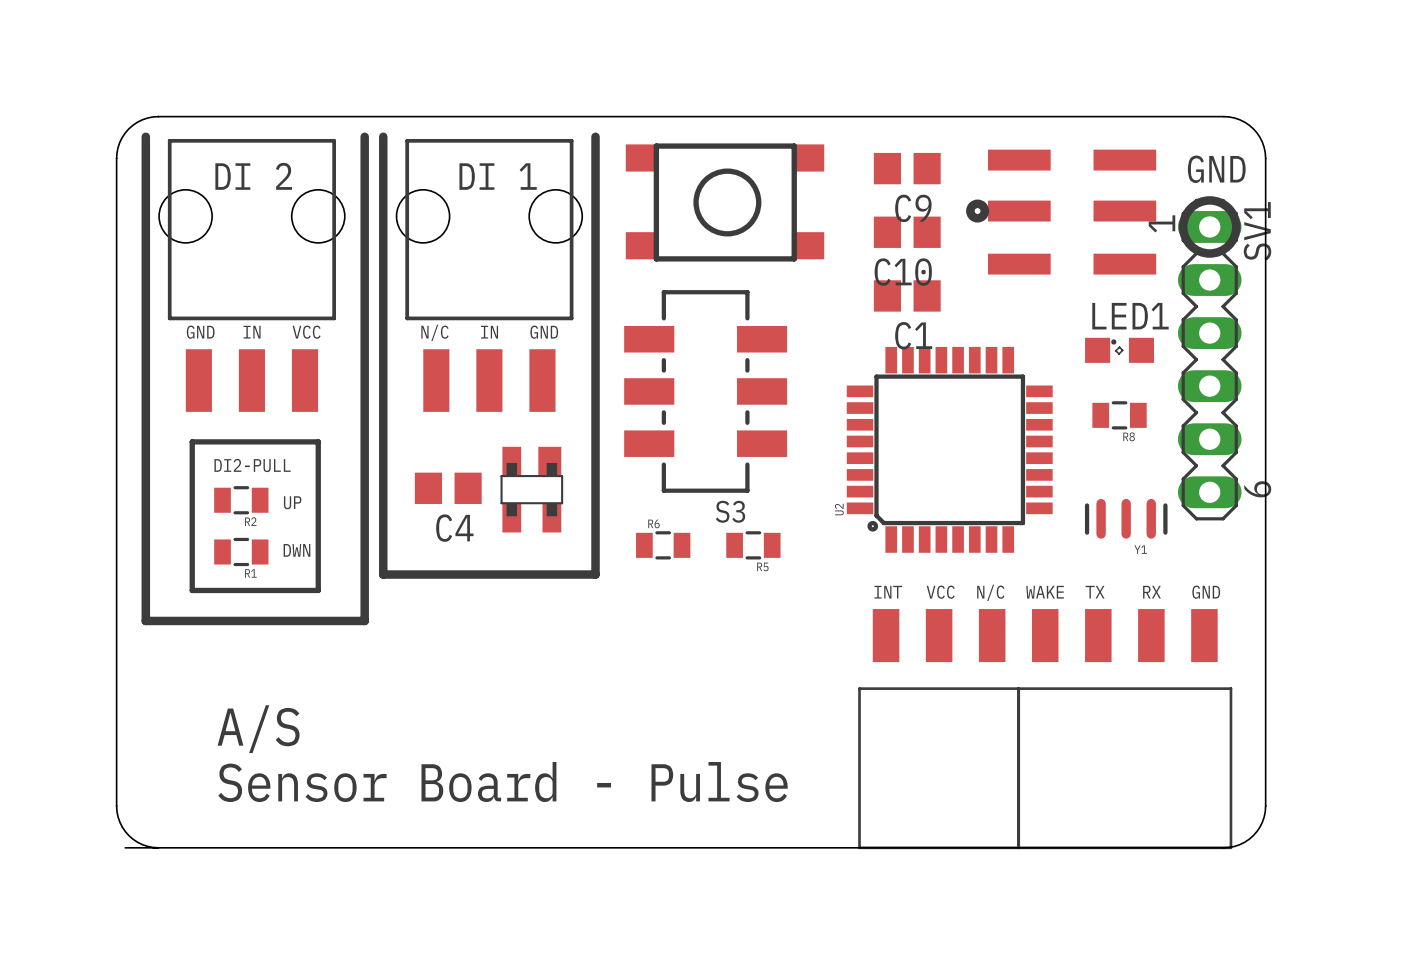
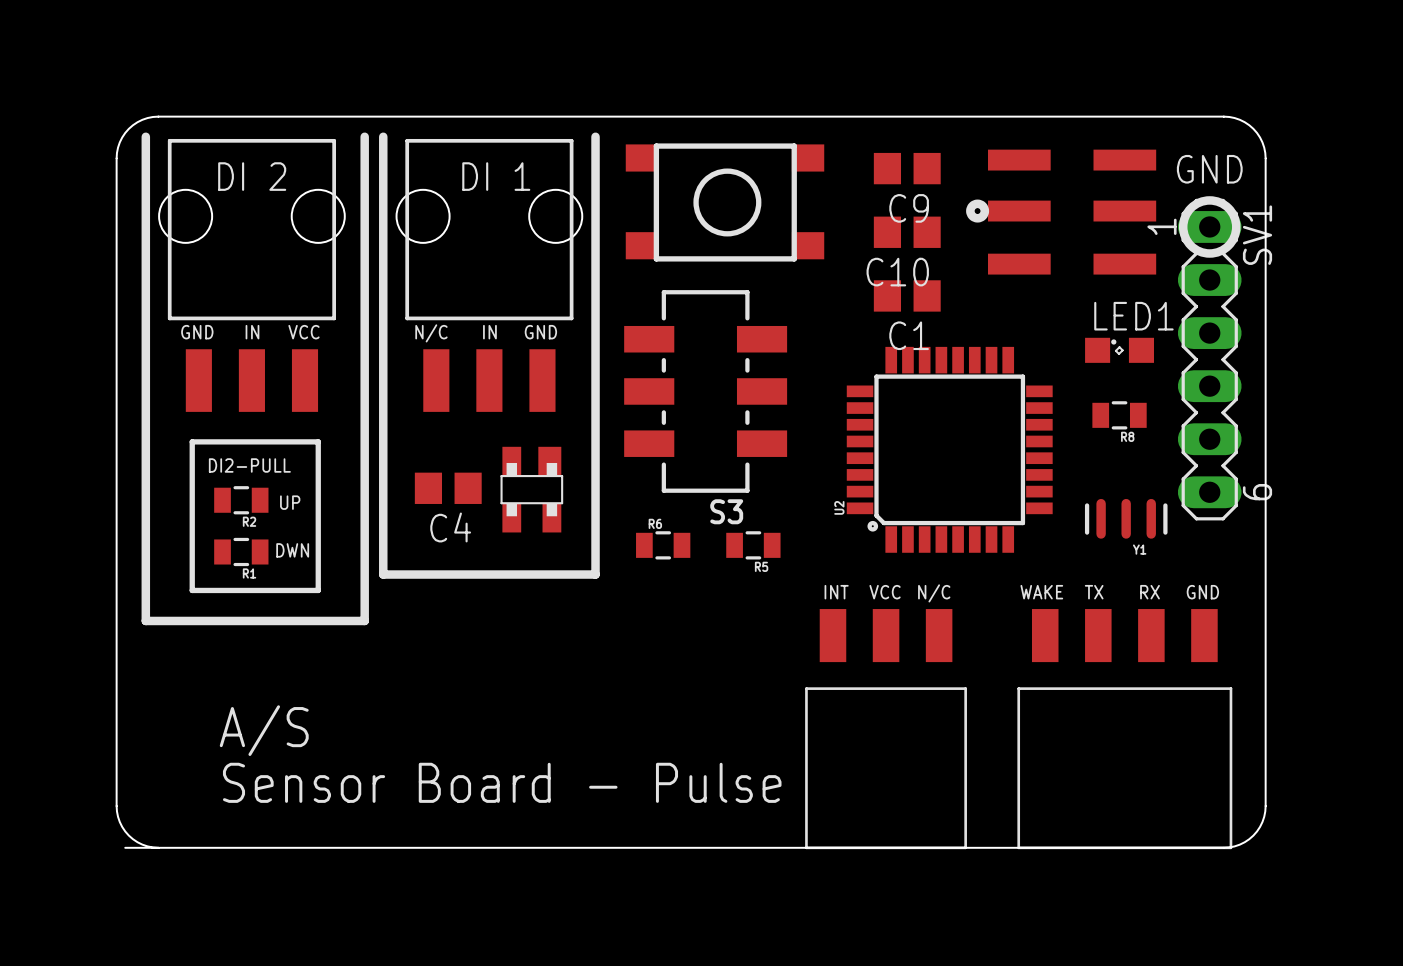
text: none -> INT (836, 592)
text: INT (888, 592) -> VCC (885, 592)
text: VCC (940, 592) -> N/C (934, 593)
text: N/C (990, 592) -> none
part position: (939, 729) -> (886, 729)

